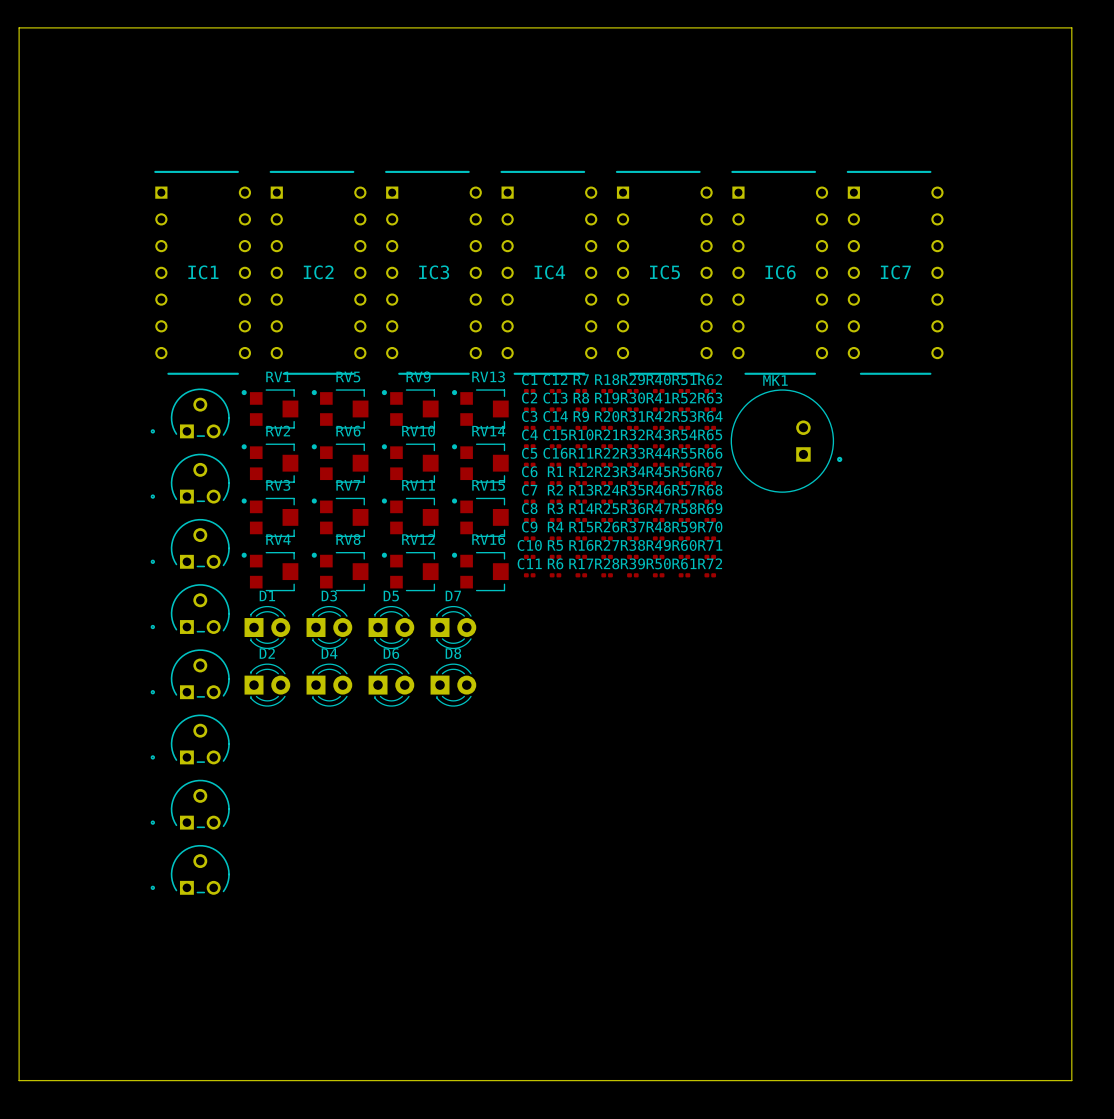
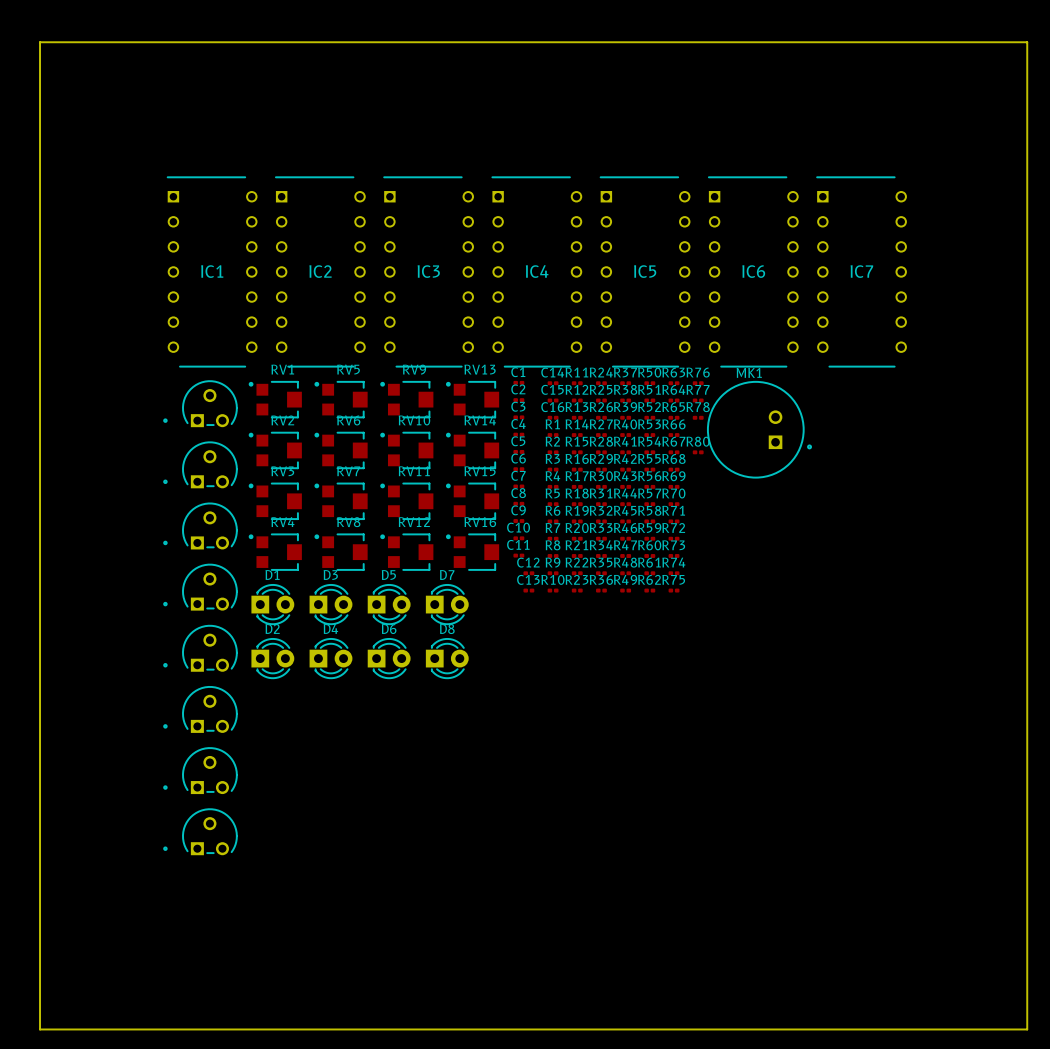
C12 position: (555, 391) -> (528, 573)
R7 position: (581, 391) -> (553, 538)
R18 position: (607, 391) -> (577, 504)
R29 position: (632, 391) -> (601, 469)
R40 position: (658, 391) -> (625, 435)
R51 position: (684, 391) -> (649, 400)
R62 position: (710, 391) -> (649, 590)
R76: none -> (698, 383)
C13 position: (555, 409) -> (528, 590)
R8 position: (581, 409) -> (553, 556)
R19 position: (607, 409) -> (577, 521)
R30 position: (632, 409) -> (601, 486)
R41 position: (658, 409) -> (625, 452)
R52 position: (684, 409) -> (649, 417)
R63 position: (710, 409) -> (674, 383)
R77: none -> (698, 400)
C14 position: (555, 427) -> (553, 383)
R9 position: (581, 427) -> (553, 573)
R20 position: (607, 427) -> (577, 538)
R31 position: (632, 427) -> (601, 504)
R42 position: (658, 427) -> (625, 469)
R53 position: (684, 427) -> (649, 435)
R64 position: (710, 427) -> (674, 400)
R78: none -> (698, 417)
C15 position: (555, 446) -> (553, 400)
R10 position: (581, 446) -> (553, 590)
R21 position: (607, 446) -> (577, 556)
R32 position: (632, 446) -> (601, 521)
R43 position: (658, 446) -> (625, 486)
R54 position: (684, 446) -> (649, 452)
R65 position: (710, 446) -> (674, 417)
C16 position: (555, 464) -> (553, 417)
R11 position: (581, 464) -> (577, 383)
R22 position: (607, 464) -> (577, 573)
R33 position: (632, 464) -> (601, 538)
R44 position: (658, 464) -> (625, 504)
R55 position: (684, 464) -> (649, 469)
R66 position: (710, 464) -> (674, 435)
R80: none -> (698, 452)
R1 position: (555, 483) -> (553, 435)
R12 position: (581, 483) -> (577, 400)
R23 position: (607, 483) -> (577, 590)
R34 position: (632, 483) -> (601, 556)
R45 position: (658, 483) -> (625, 521)
R56 position: (684, 483) -> (649, 486)
R67 position: (710, 483) -> (674, 452)
R2 position: (555, 501) -> (553, 452)
R13 position: (581, 501) -> (577, 417)
R24 position: (607, 501) -> (601, 383)
R35 position: (632, 501) -> (601, 573)
R46 position: (658, 501) -> (625, 538)
R57 position: (684, 501) -> (649, 504)
R68 position: (710, 501) -> (674, 469)
R3 position: (555, 520) -> (553, 469)
R14 position: (581, 520) -> (577, 435)
R25 position: (607, 520) -> (601, 400)
R36 position: (632, 520) -> (601, 590)
R47 position: (658, 520) -> (625, 556)
R58 position: (684, 520) -> (649, 521)
R69 position: (710, 520) -> (674, 486)
R4 position: (555, 538) -> (553, 486)
R15 position: (581, 538) -> (577, 452)
R26 position: (607, 538) -> (601, 417)
R37 position: (632, 538) -> (625, 383)
R48 position: (658, 538) -> (625, 573)
R59 position: (684, 538) -> (649, 538)
R70 position: (710, 538) -> (674, 504)
R5 position: (555, 556) -> (553, 504)
R16 position: (581, 556) -> (577, 469)
R27 position: (607, 556) -> (601, 435)
R38 position: (632, 556) -> (625, 400)
R49 position: (658, 556) -> (625, 590)
R60 position: (684, 556) -> (649, 556)
R71 position: (710, 556) -> (674, 521)
R6 position: (555, 575) -> (553, 521)
R17 position: (581, 575) -> (577, 486)
R28 position: (607, 575) -> (601, 452)
R39 position: (632, 575) -> (625, 417)
R50 position: (658, 575) -> (649, 383)
R61 position: (684, 575) -> (649, 573)
R73: none -> (674, 556)
R72 position: (710, 575) -> (674, 538)
R74: none -> (674, 573)
R75: none -> (674, 590)

